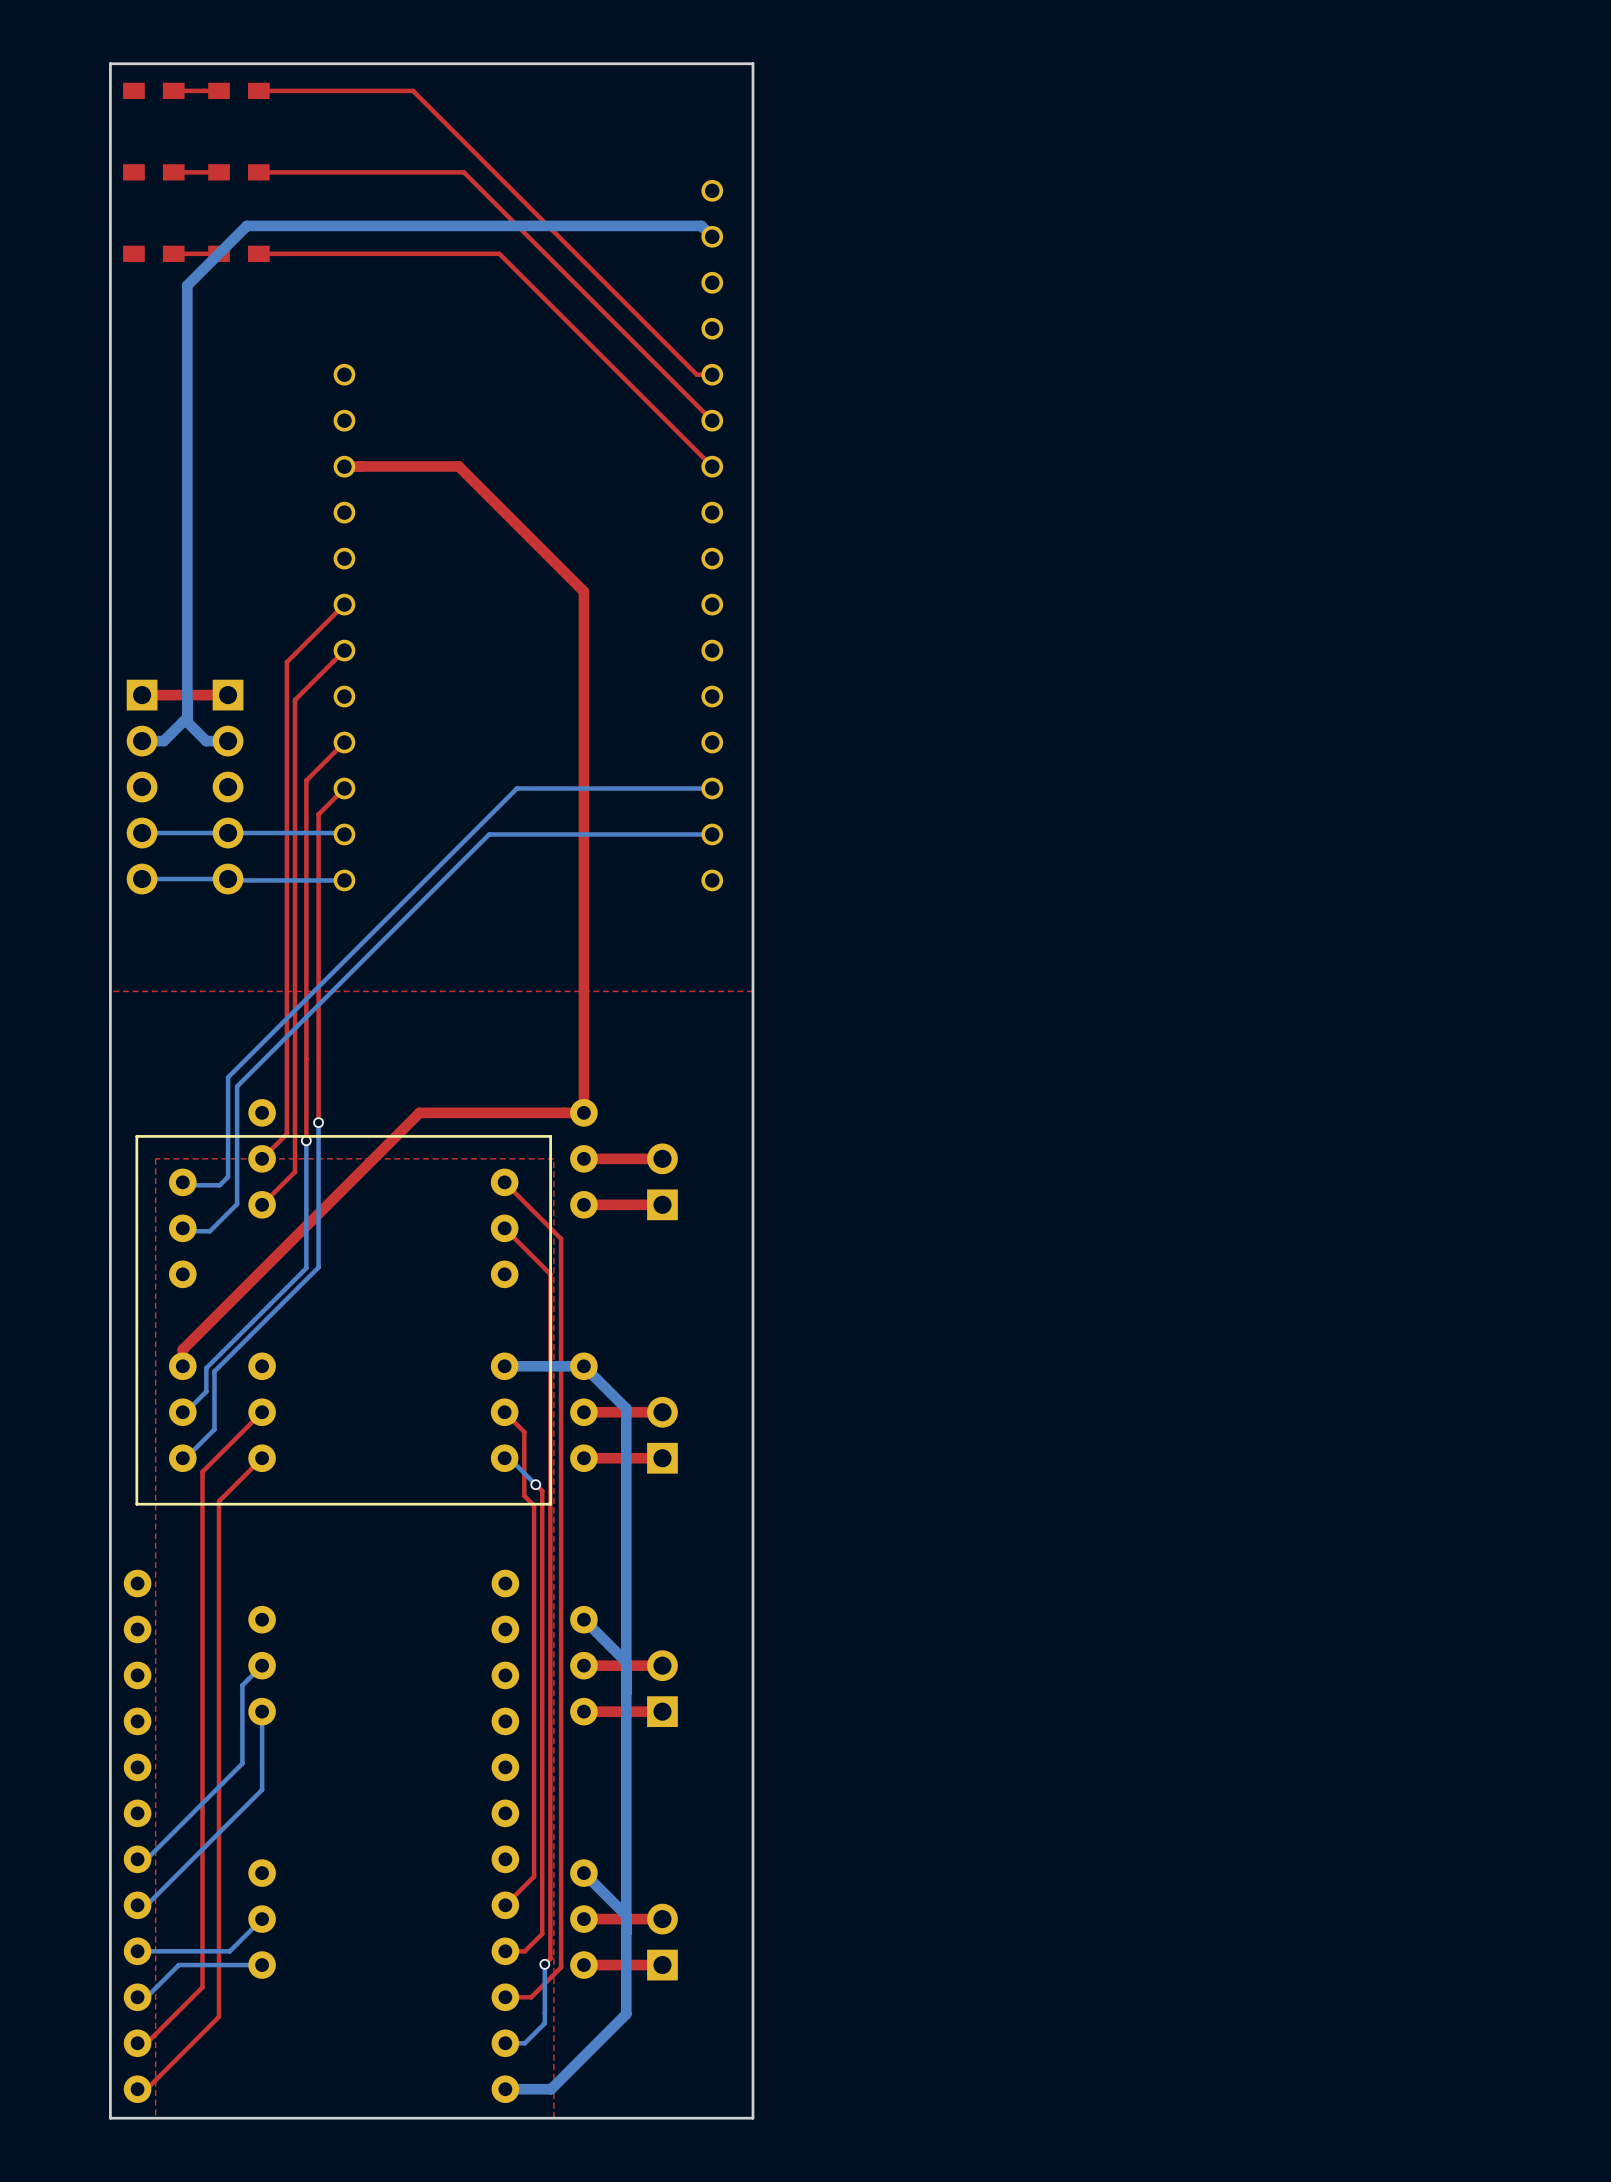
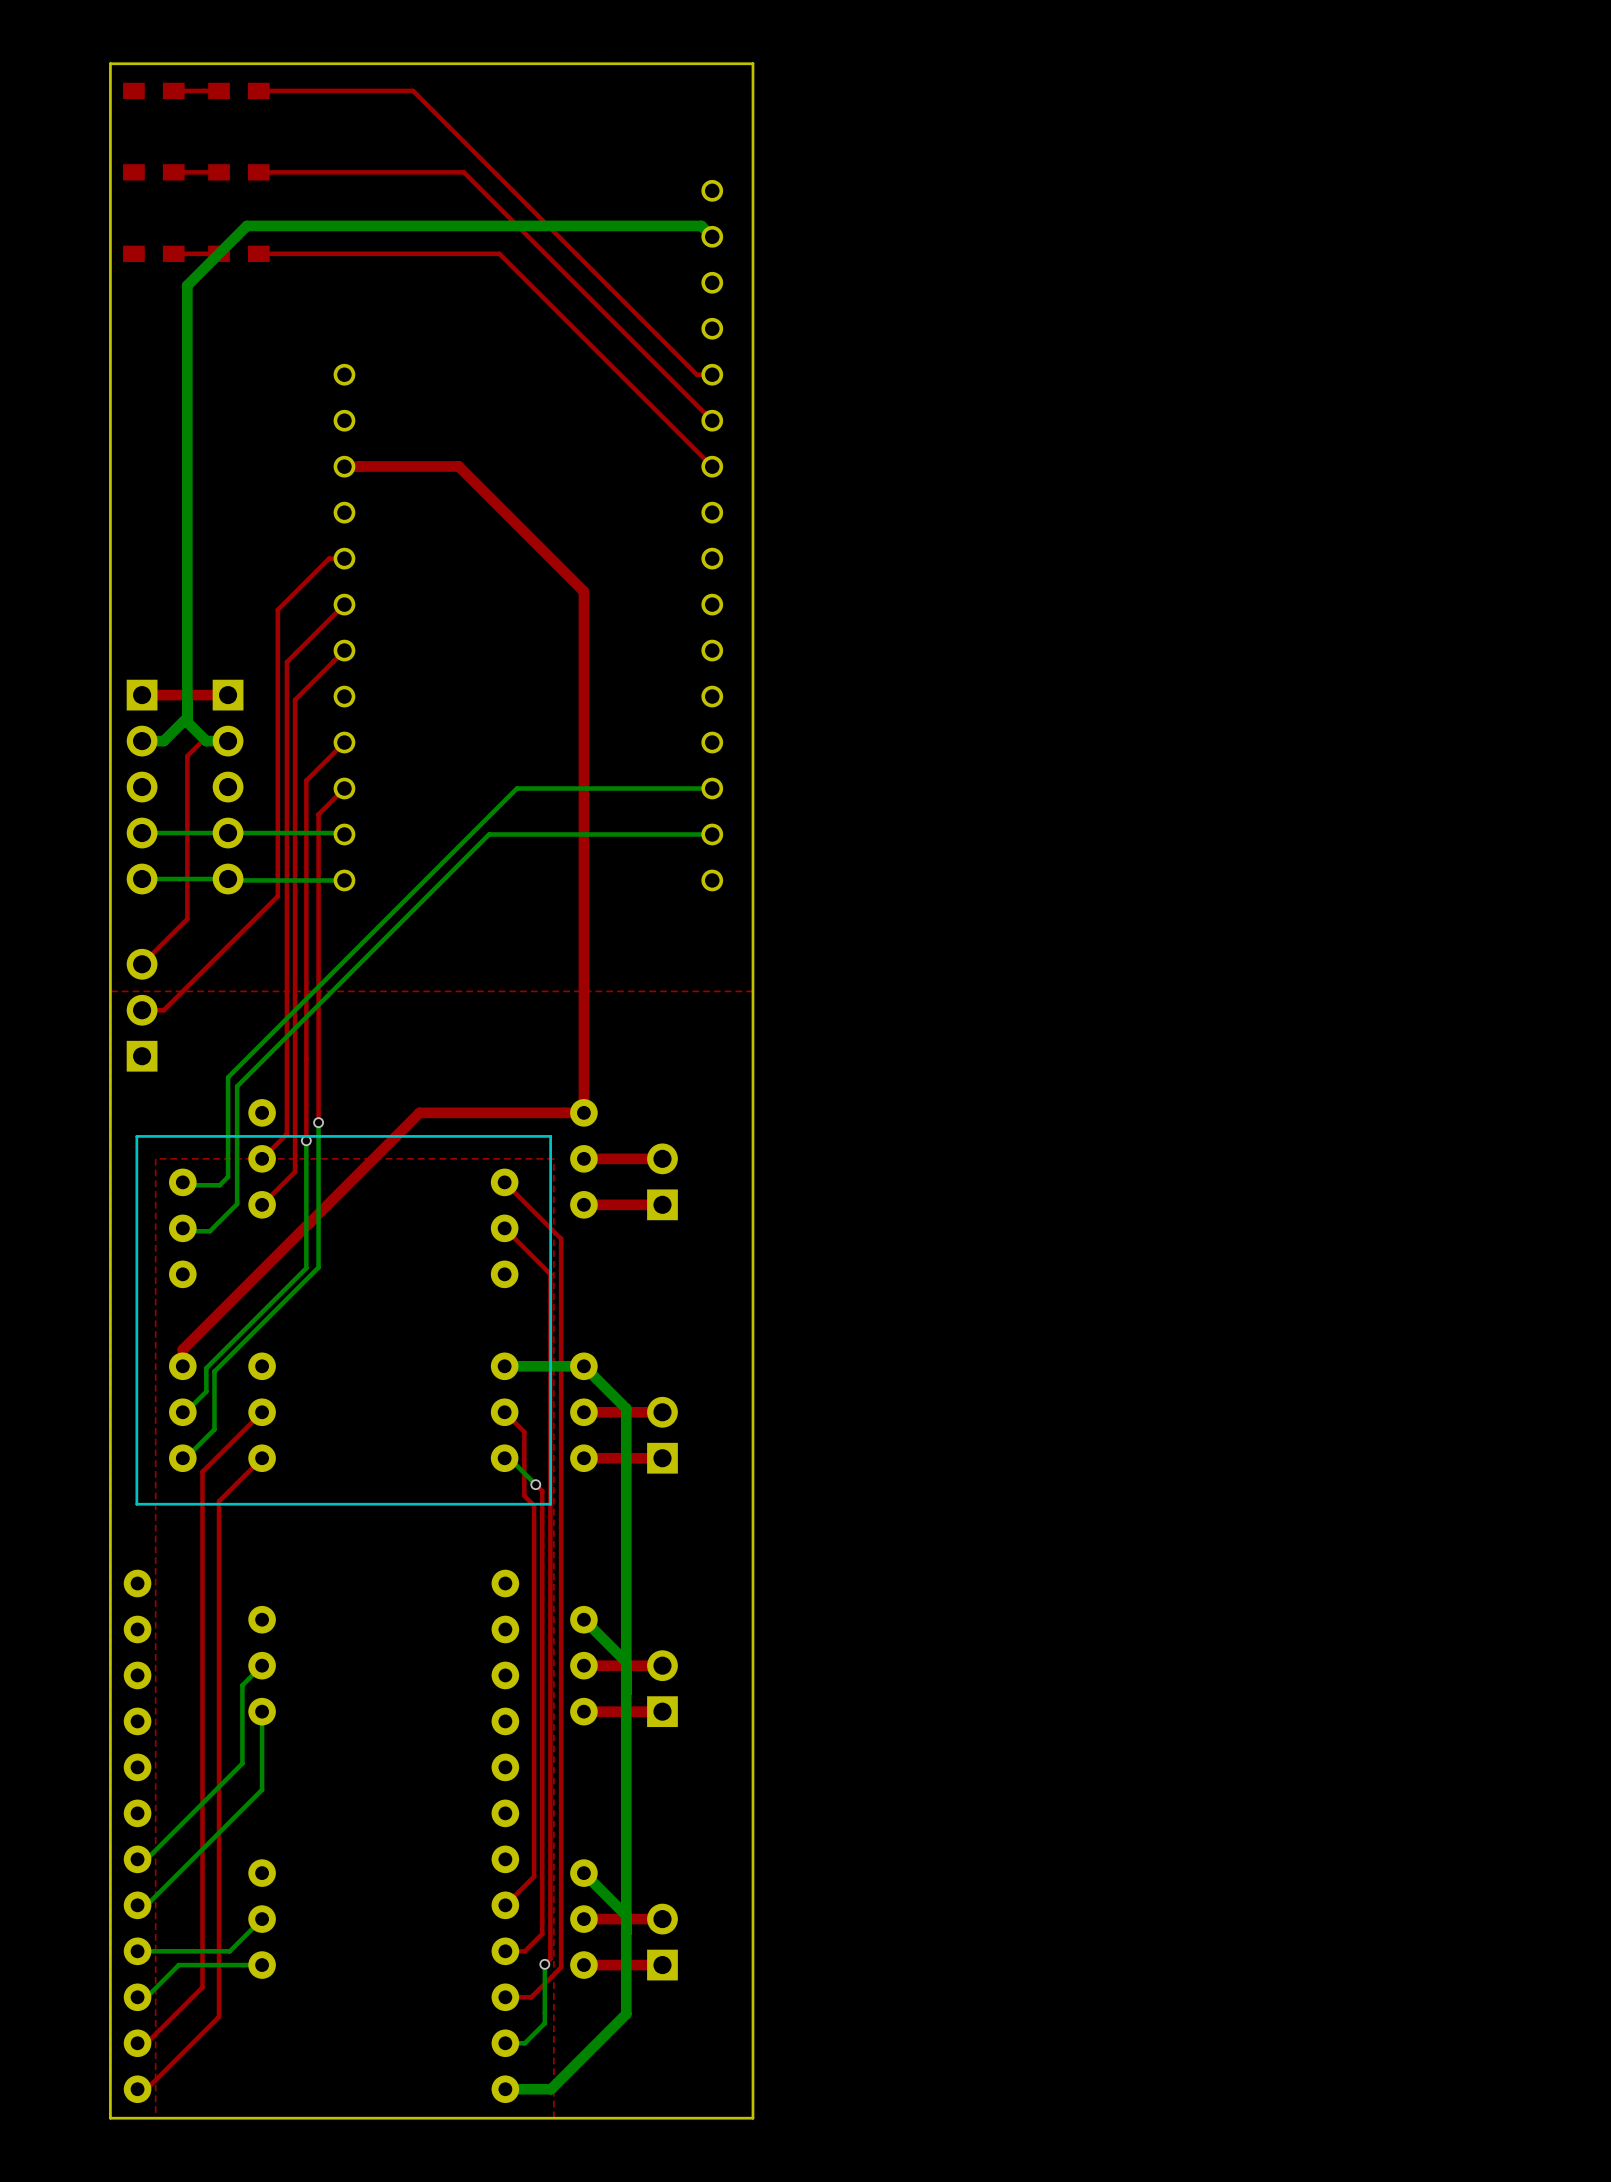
top track: none -> (344, 558) (329, 558) (277, 609) (277, 896)
top track: none -> (228, 741) (202, 741) (187, 756) (187, 919) (142, 964)
top track: none -> (277, 896) (163, 1010) (142, 1010)
part: none -> (142, 1010)

